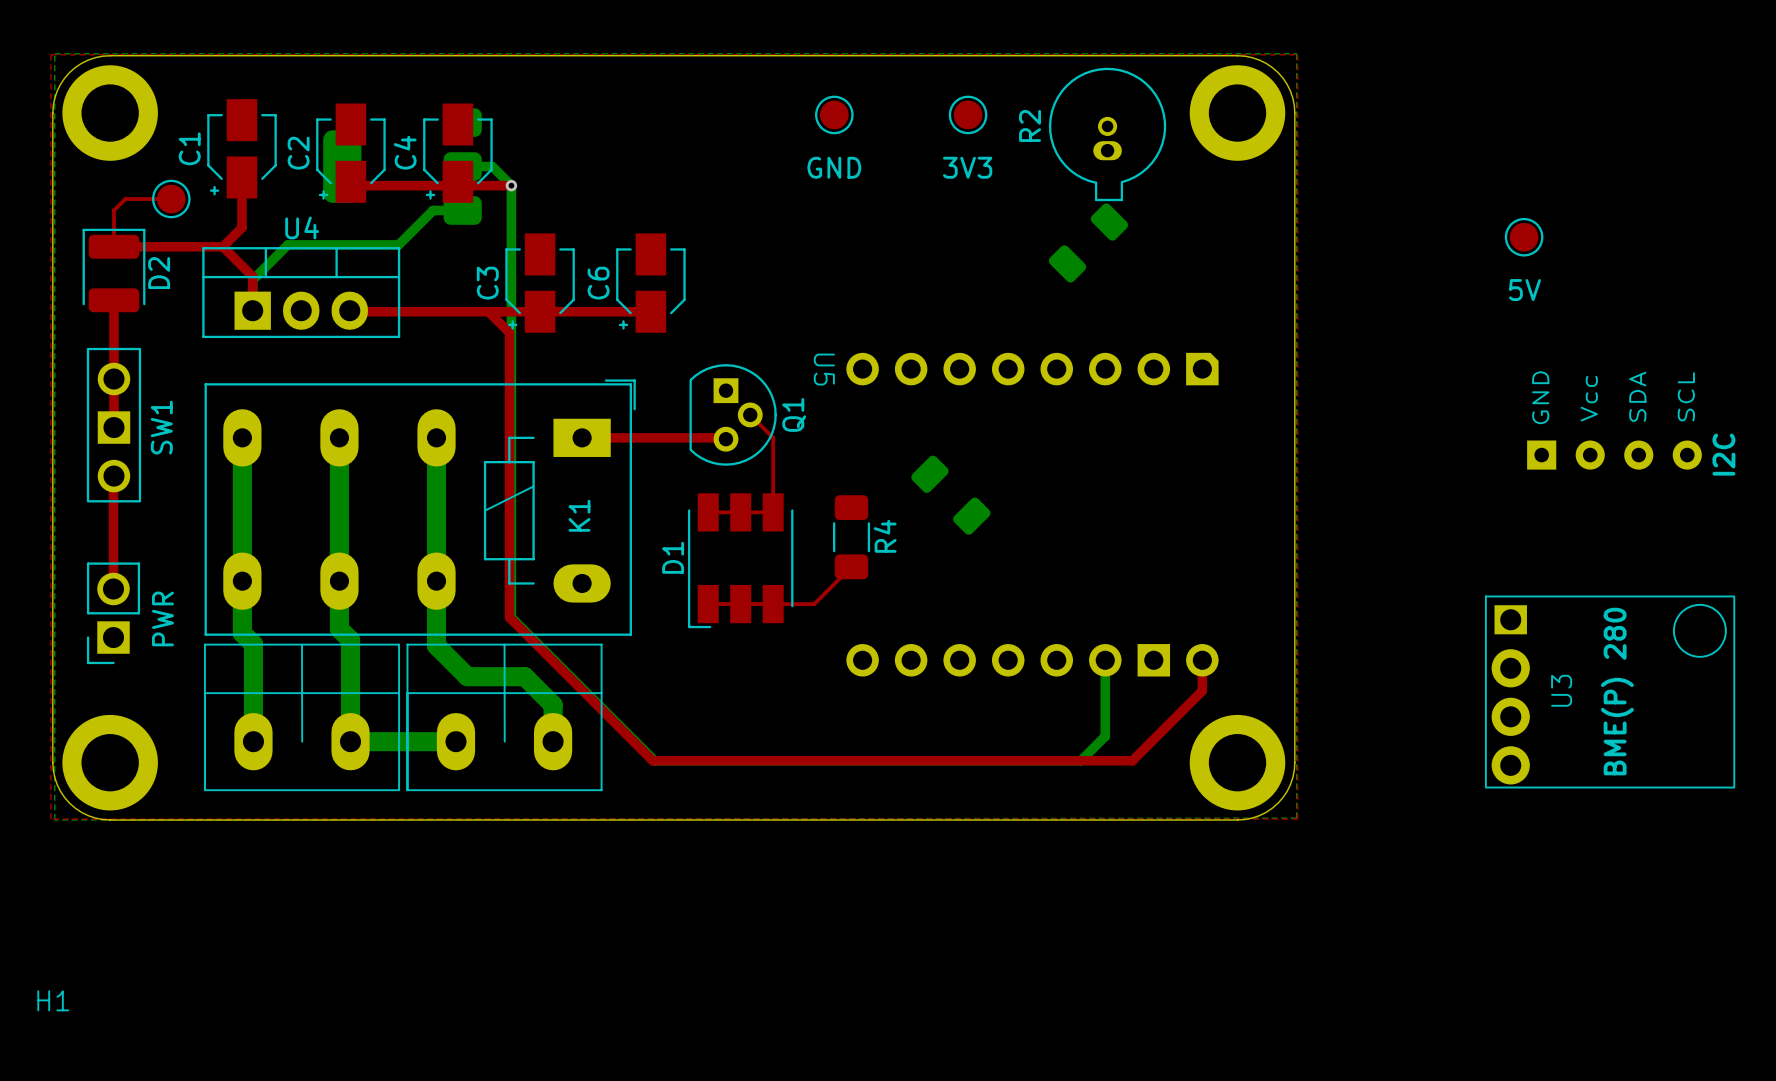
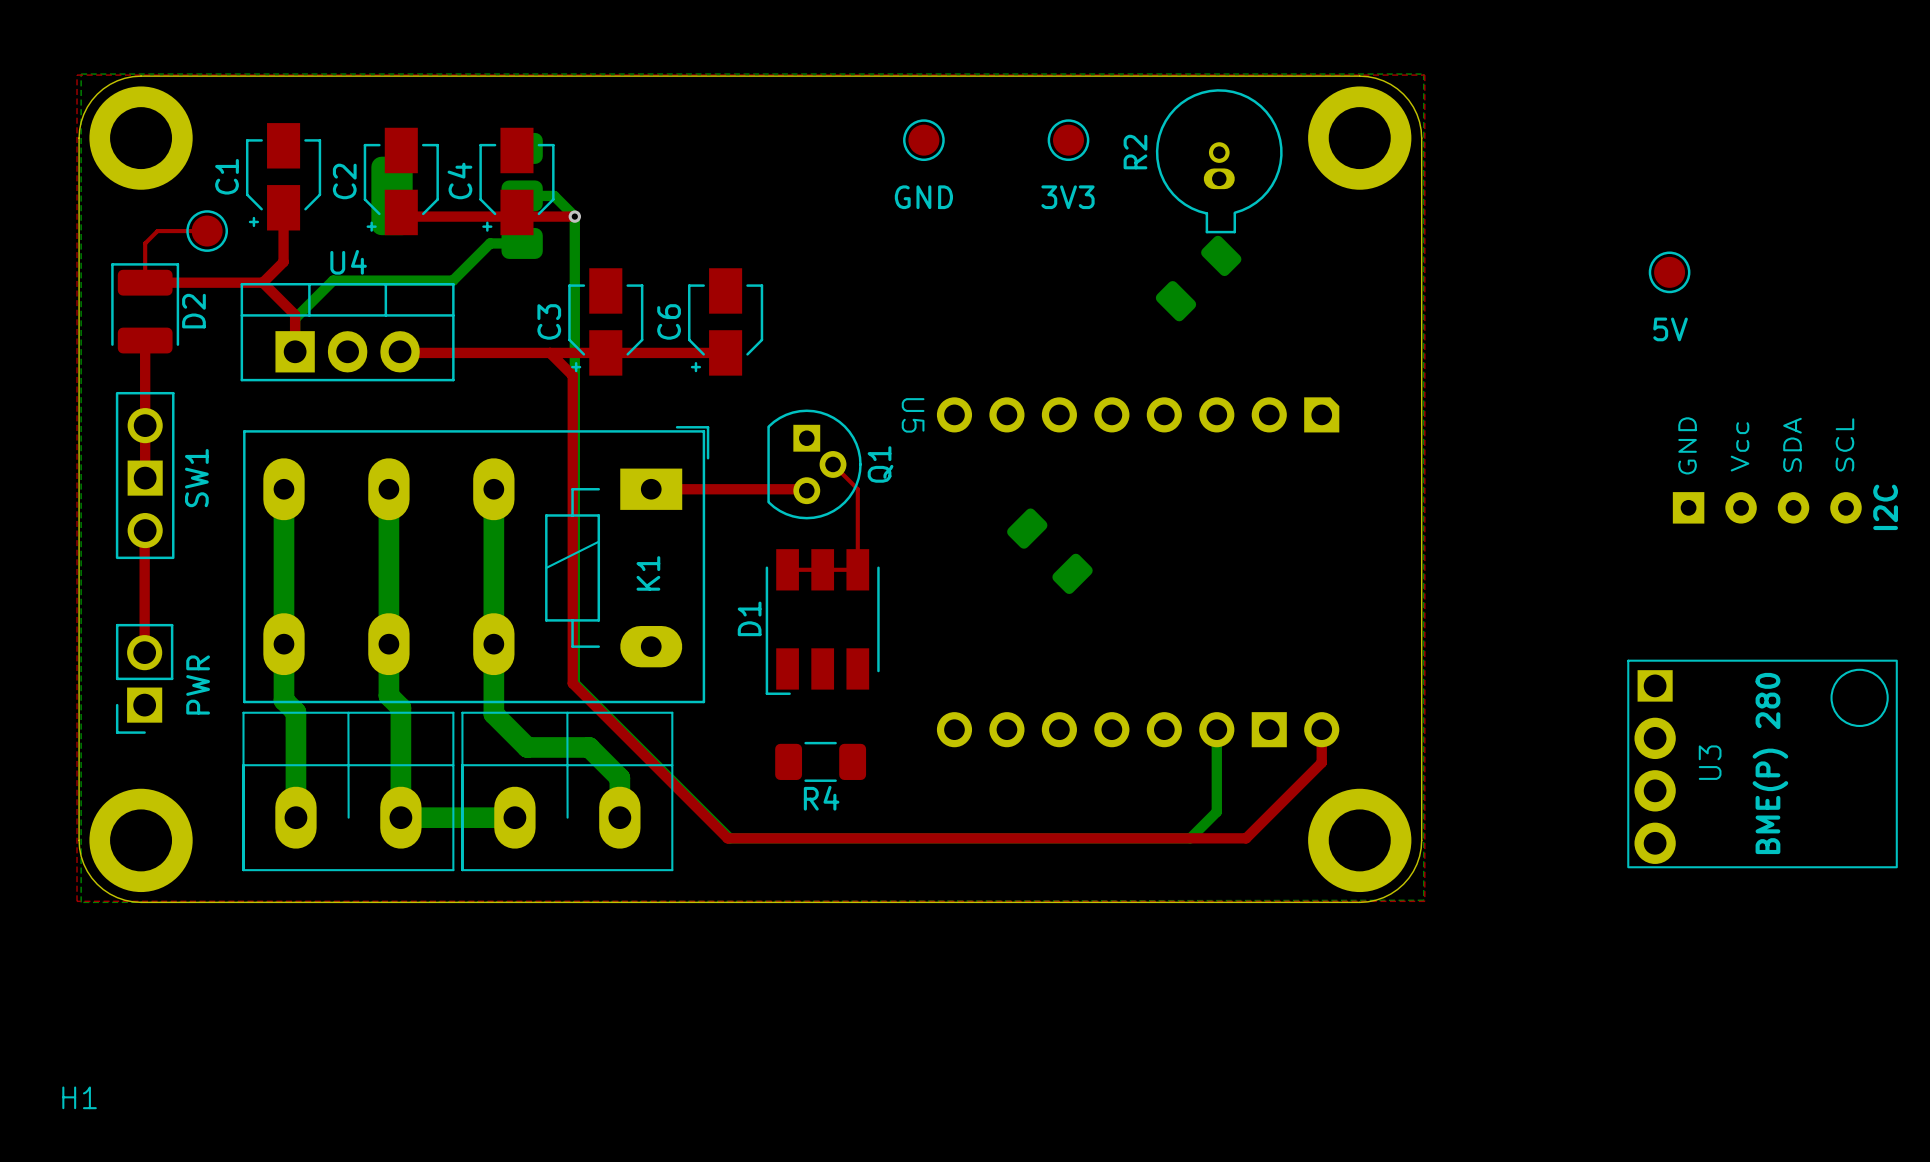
R4 rotation: 0° (851, 537) -> 90° clockwise (820, 761)
R4 position: (851, 537) -> (820, 761)
top track: (851, 566) (814, 604) (708, 604) -> none

